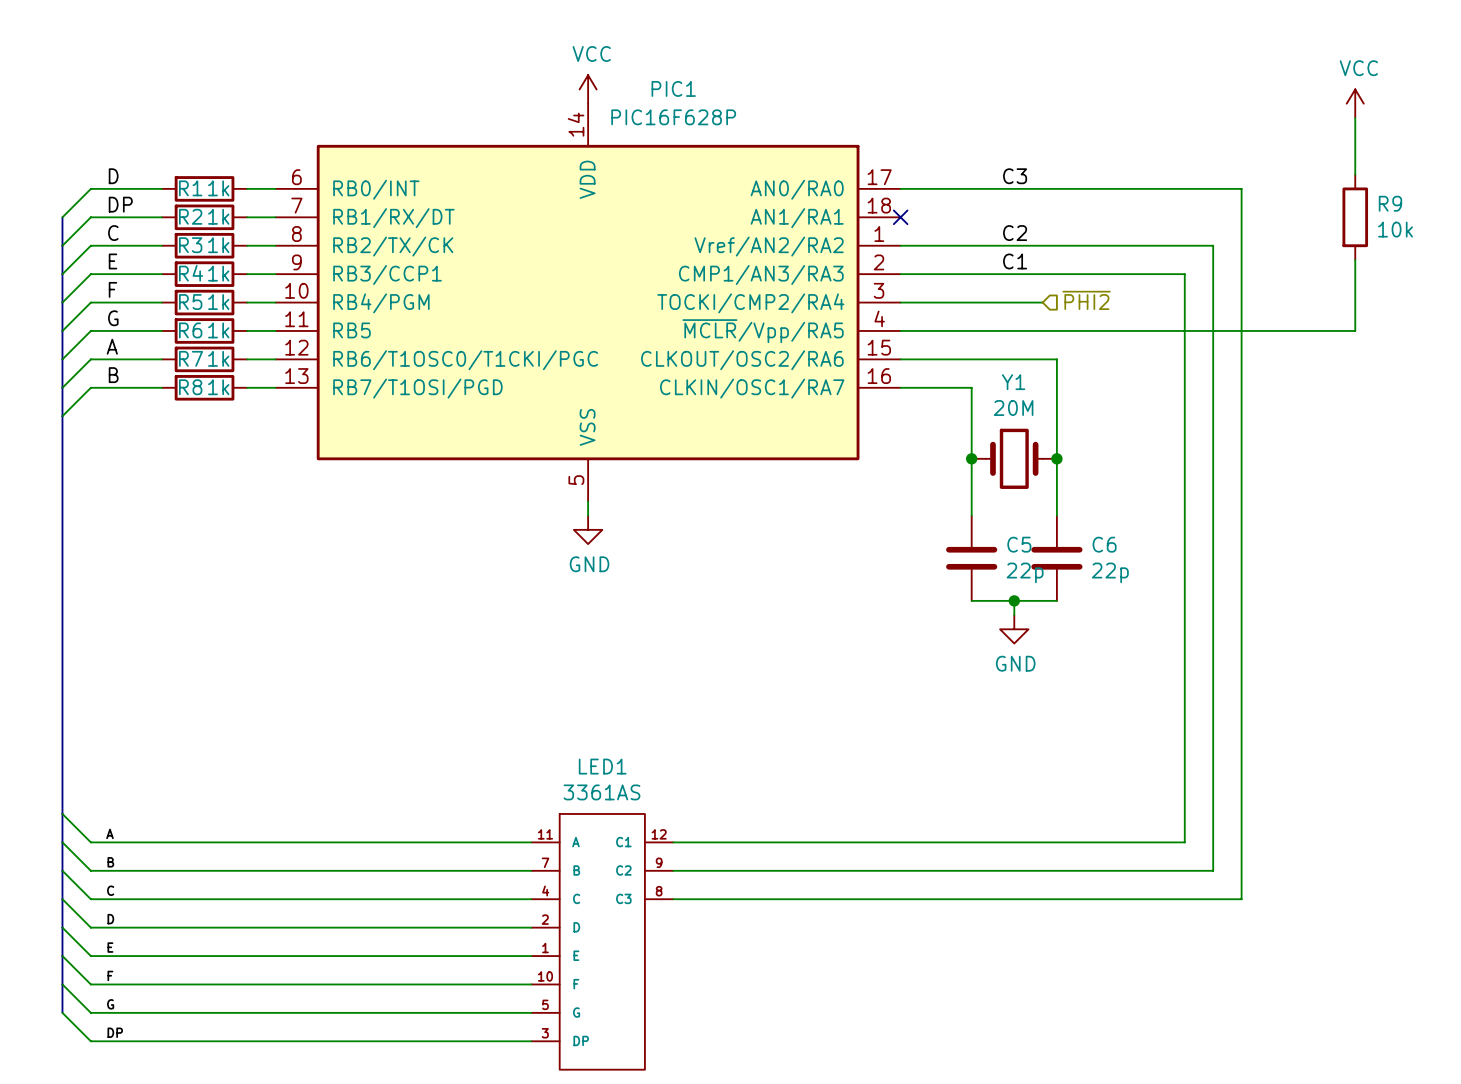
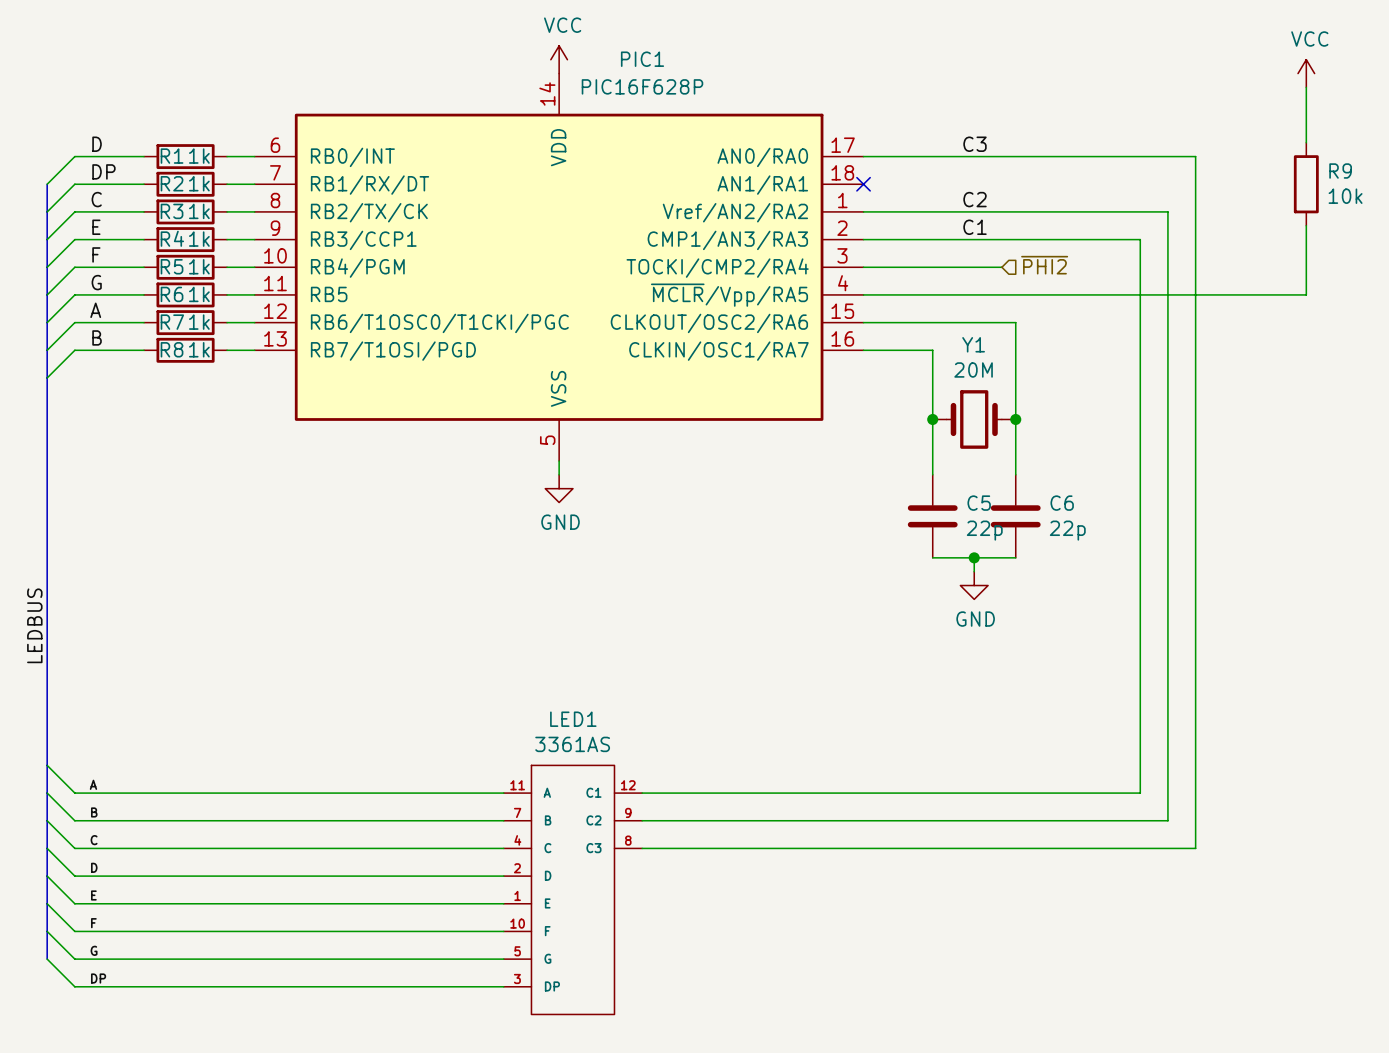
label: none -> LEDBUS (34, 625)

